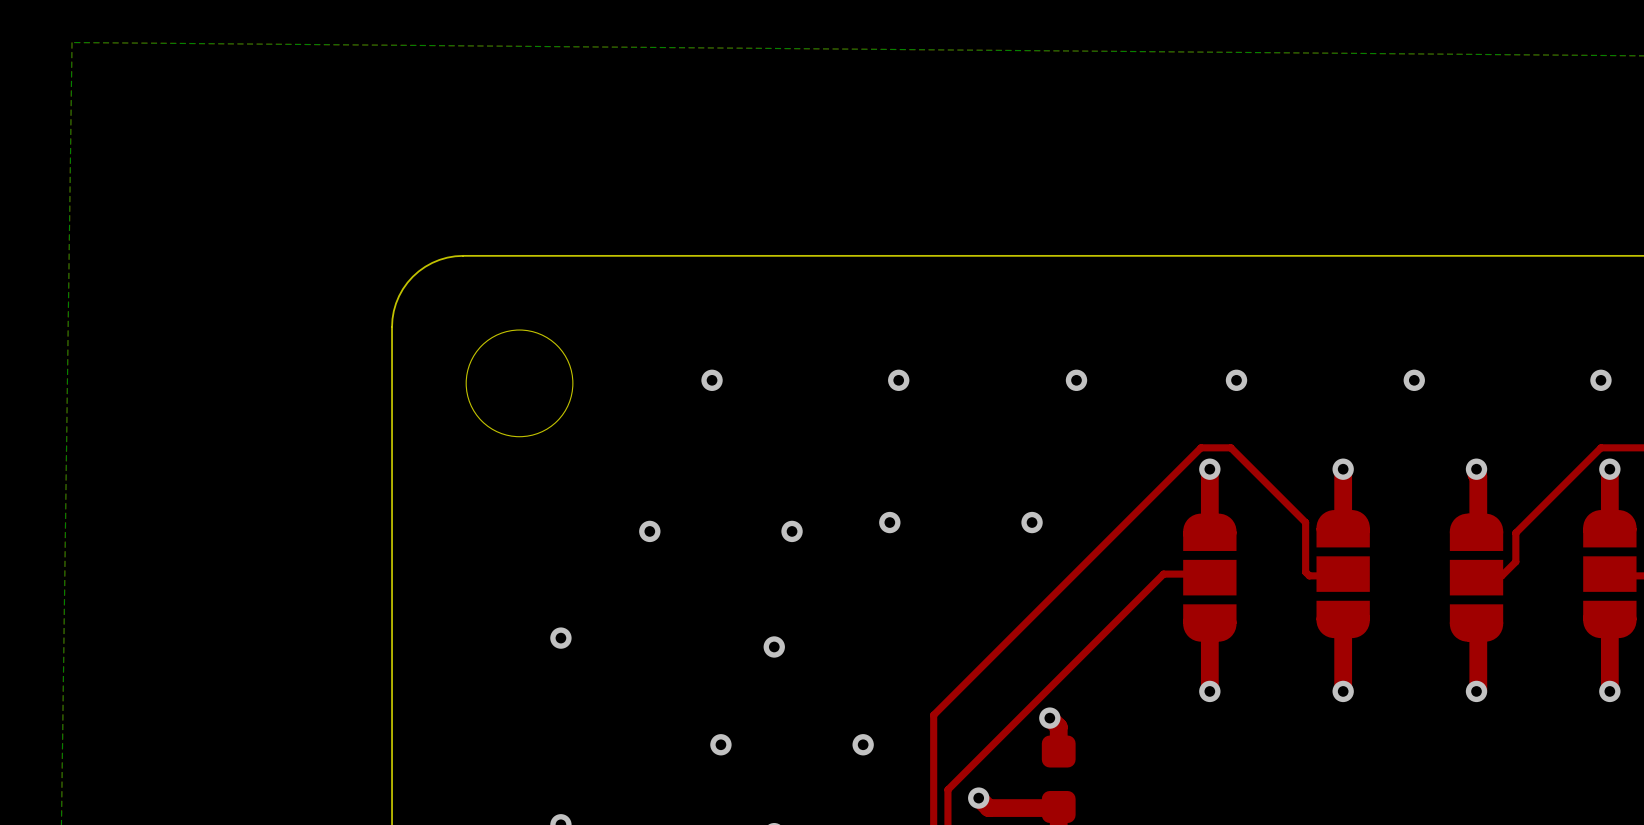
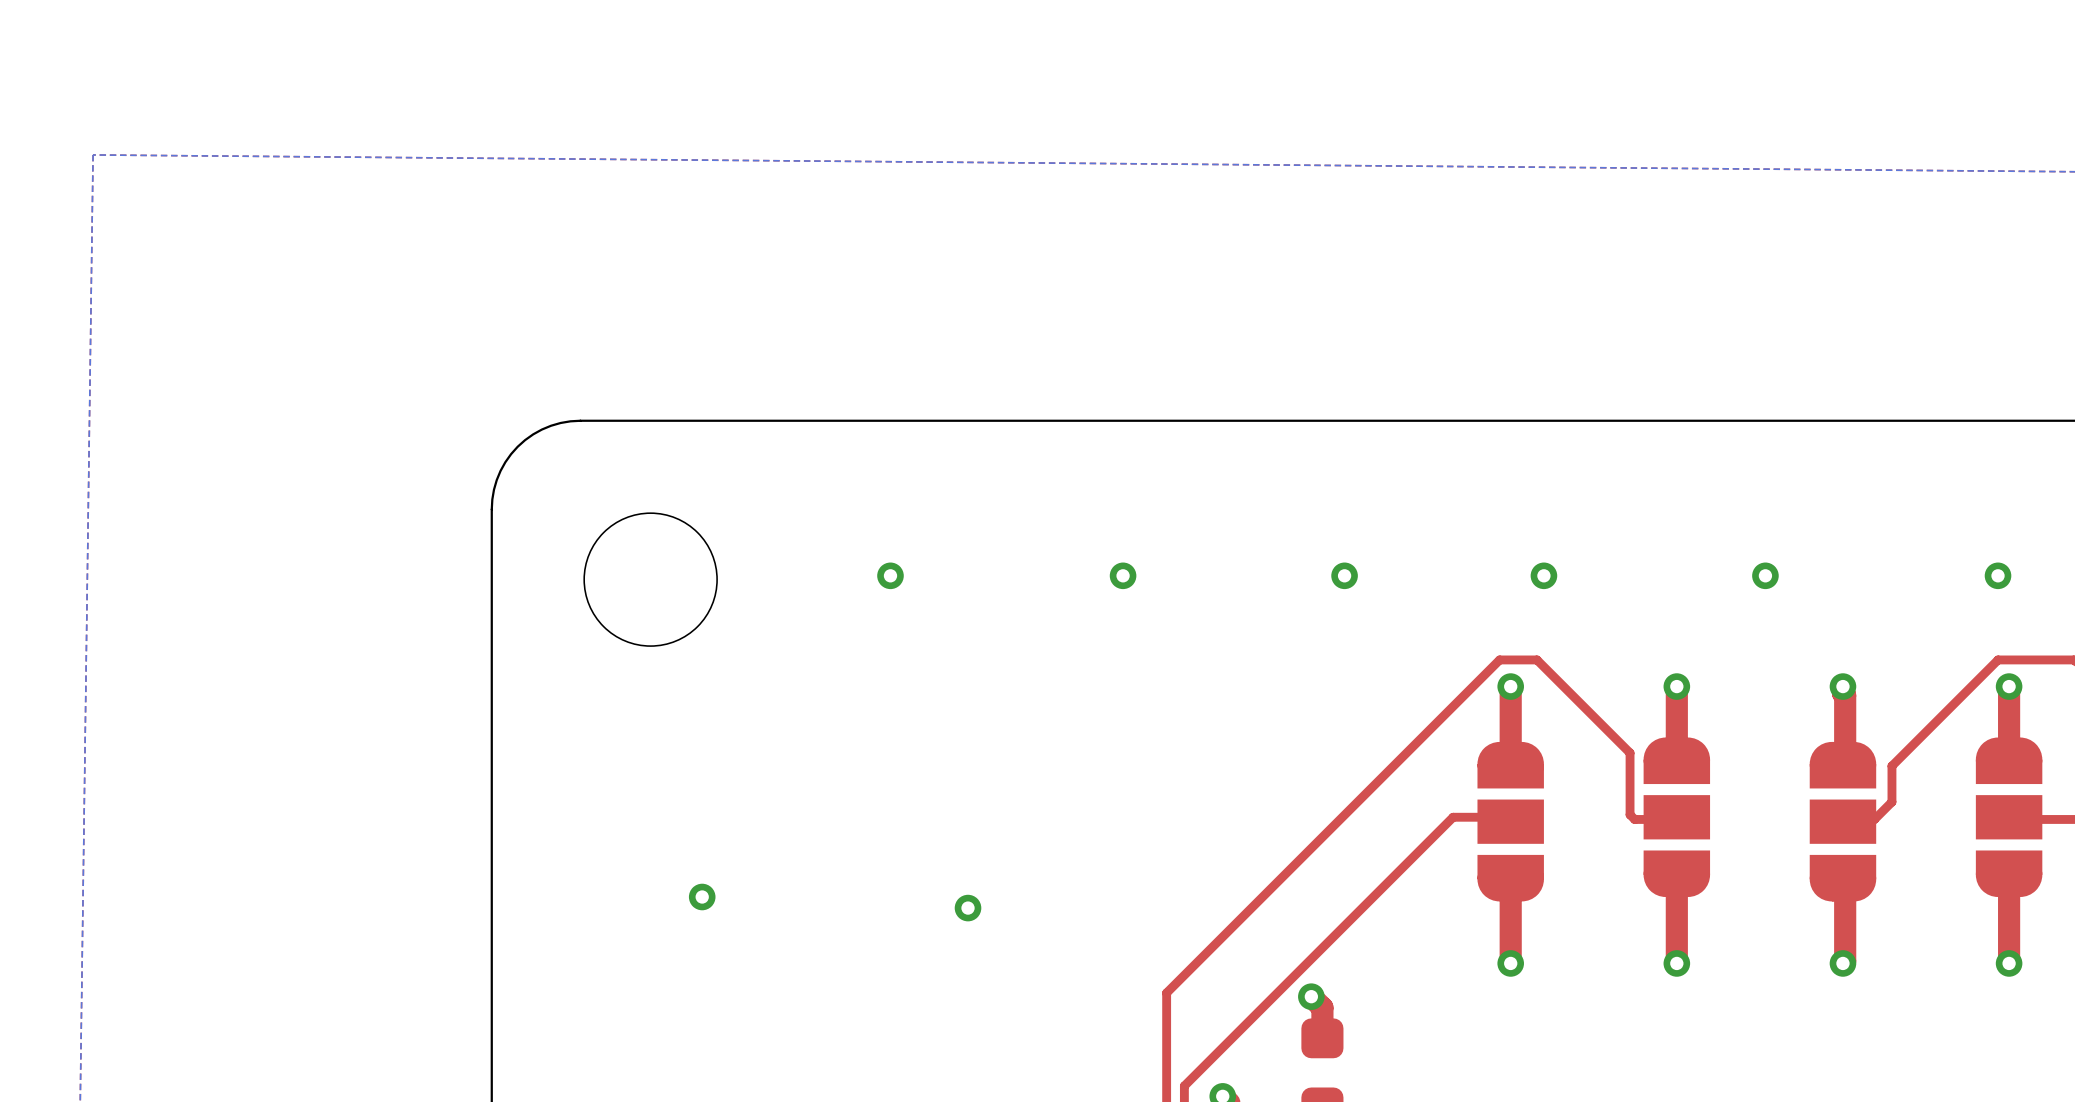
via: (889, 522) -> none
via: (1032, 522) -> none
via: (649, 531) -> none
via: (792, 531) -> none
via: (720, 744) -> none
via: (863, 744) -> none

